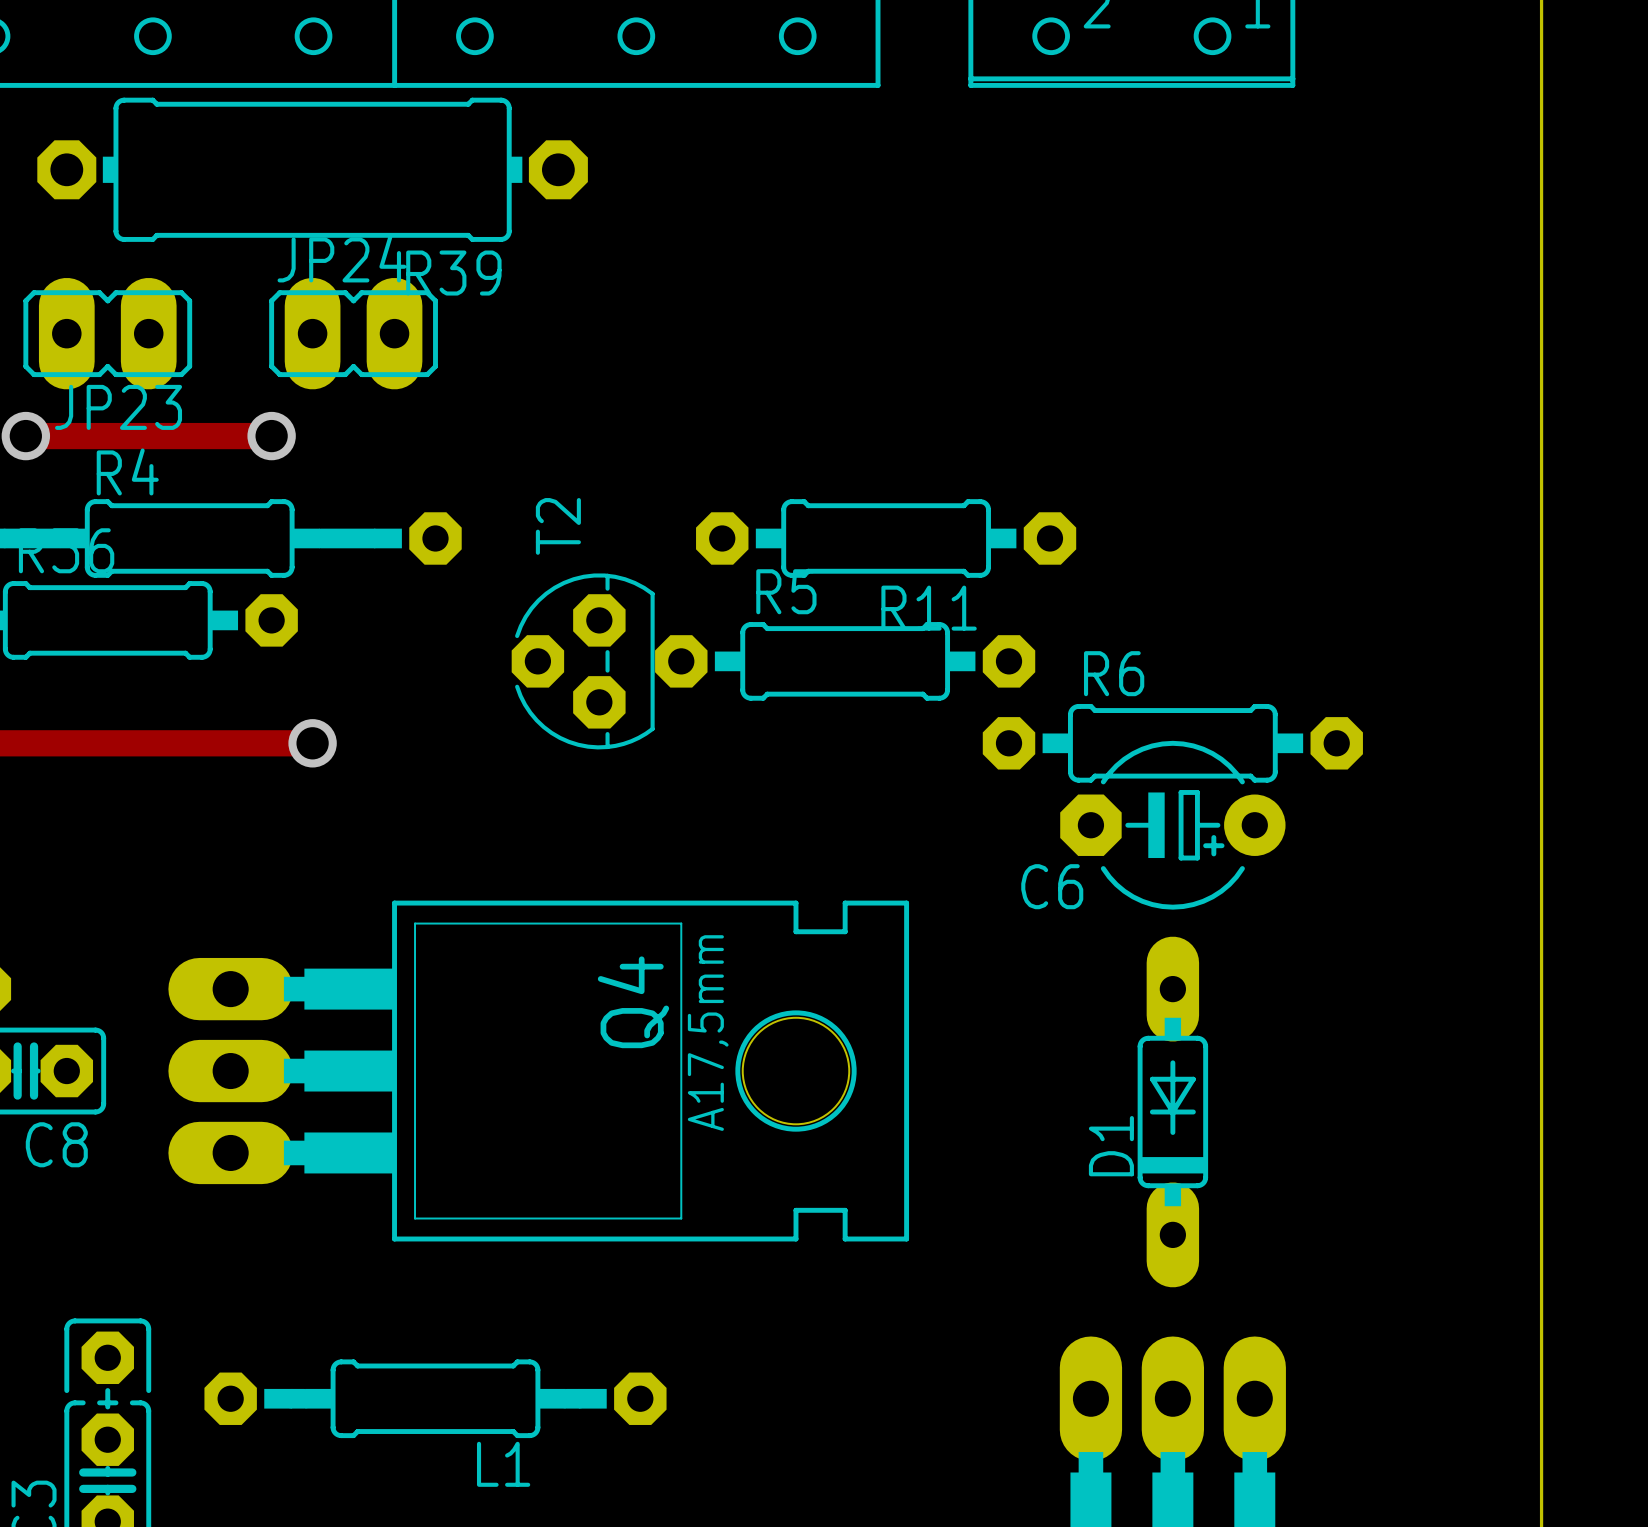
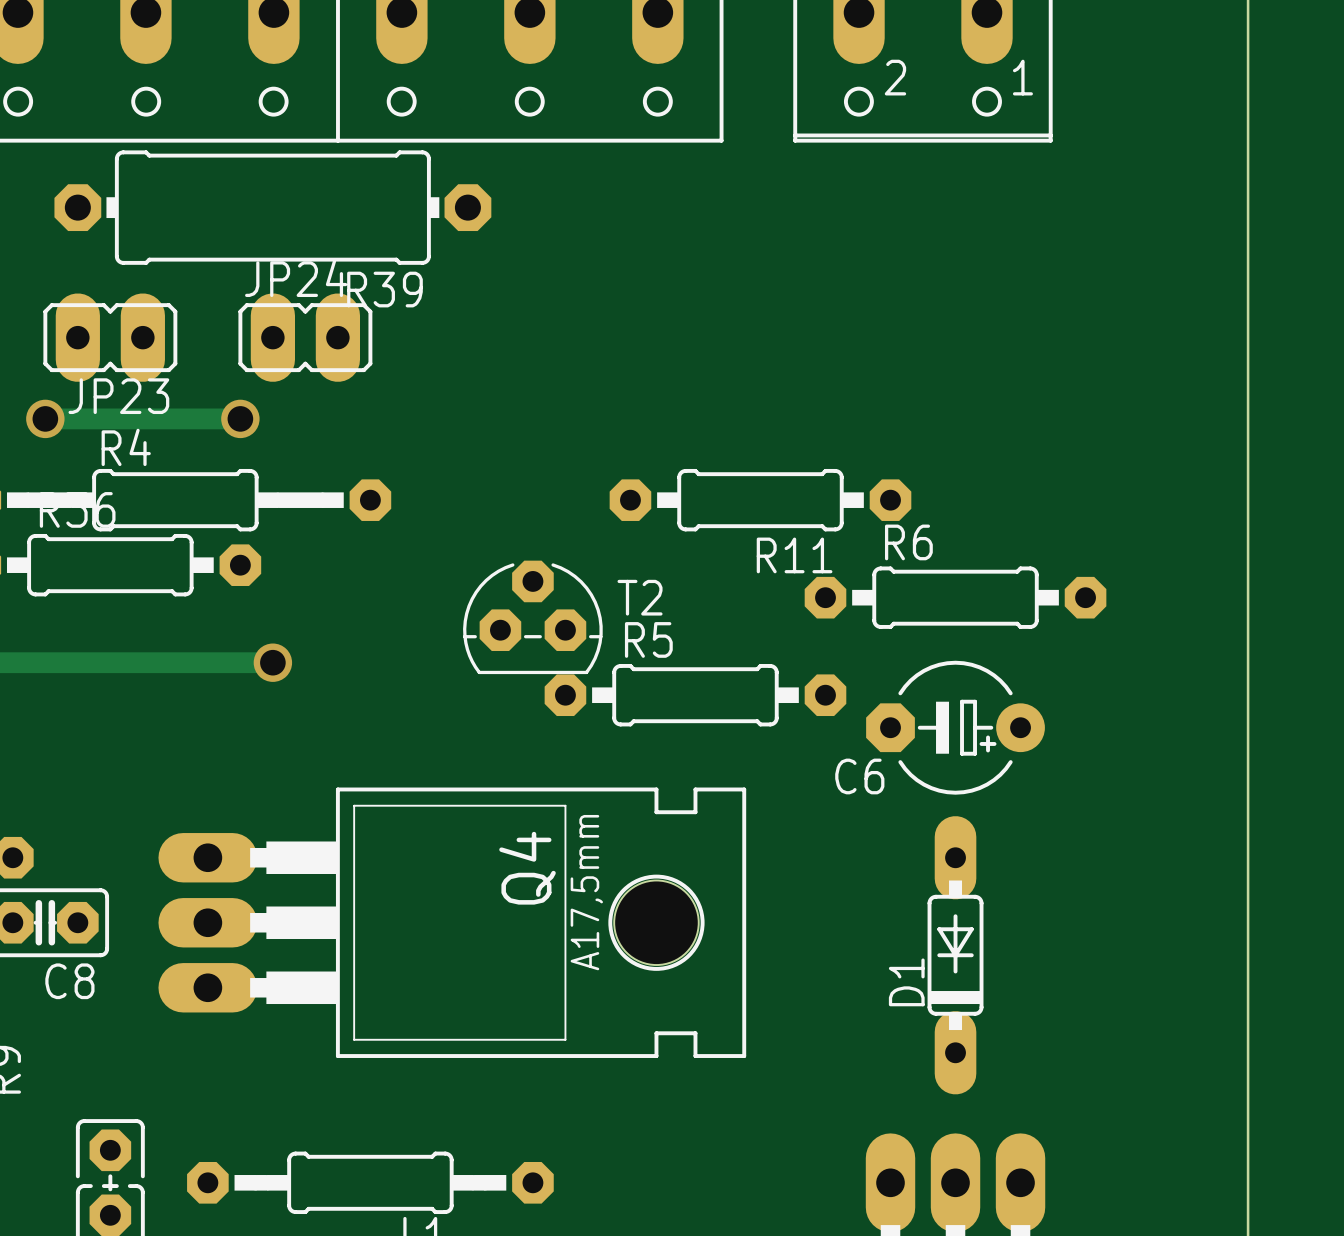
R11 position: (886, 538) -> (760, 500)
T2 rotation: 0° (583, 661) -> 90° clockwise (532, 617)
R5 position: (845, 661) -> (695, 695)
R6 position: (1172, 743) -> (955, 597)

